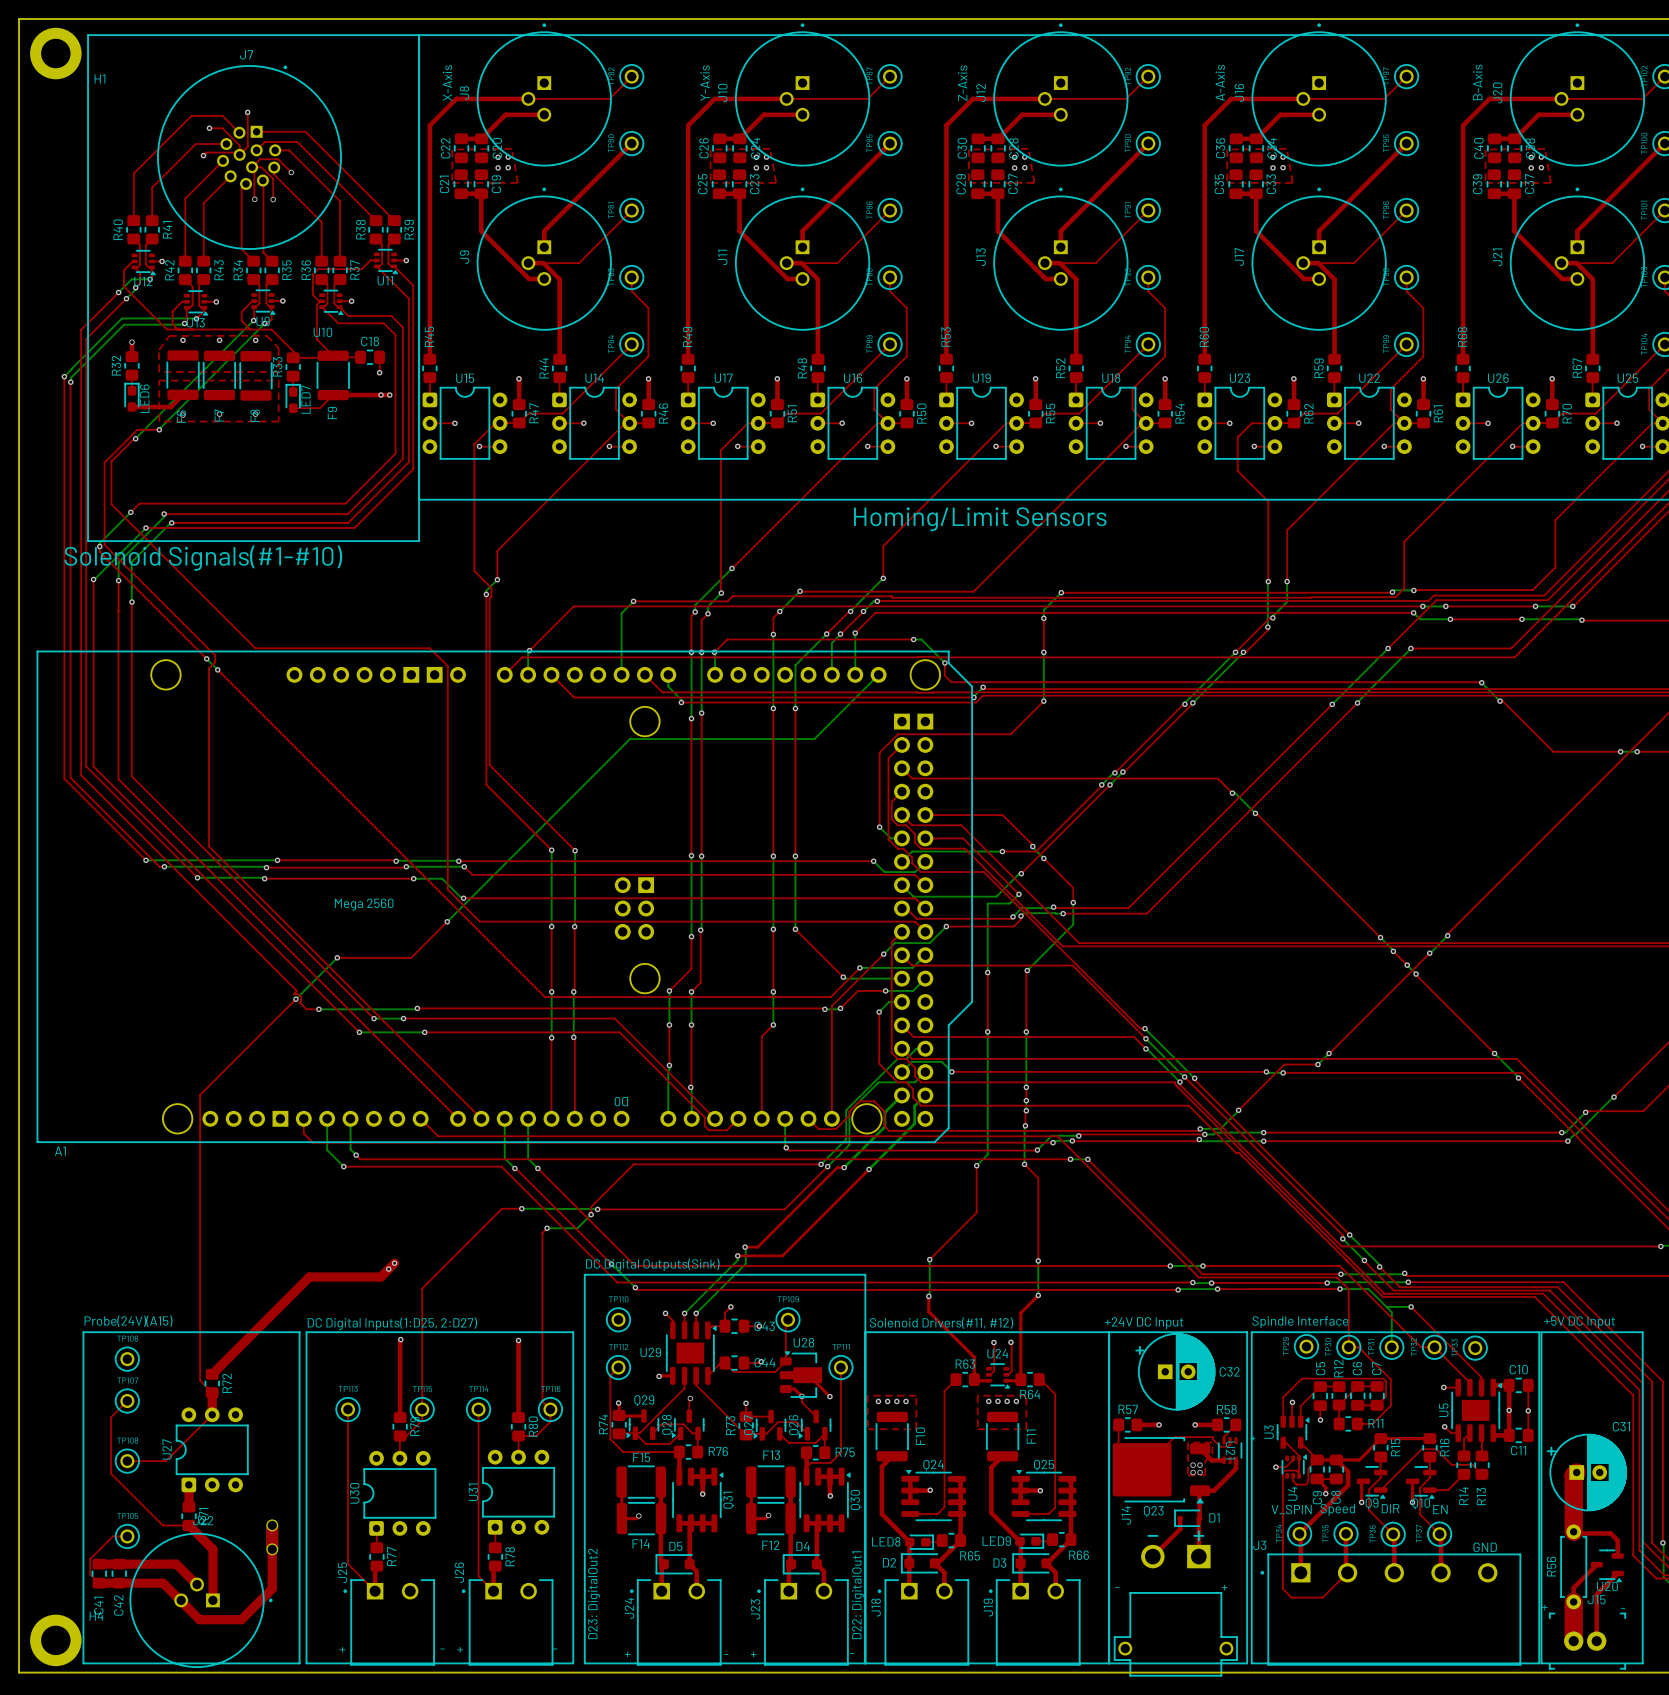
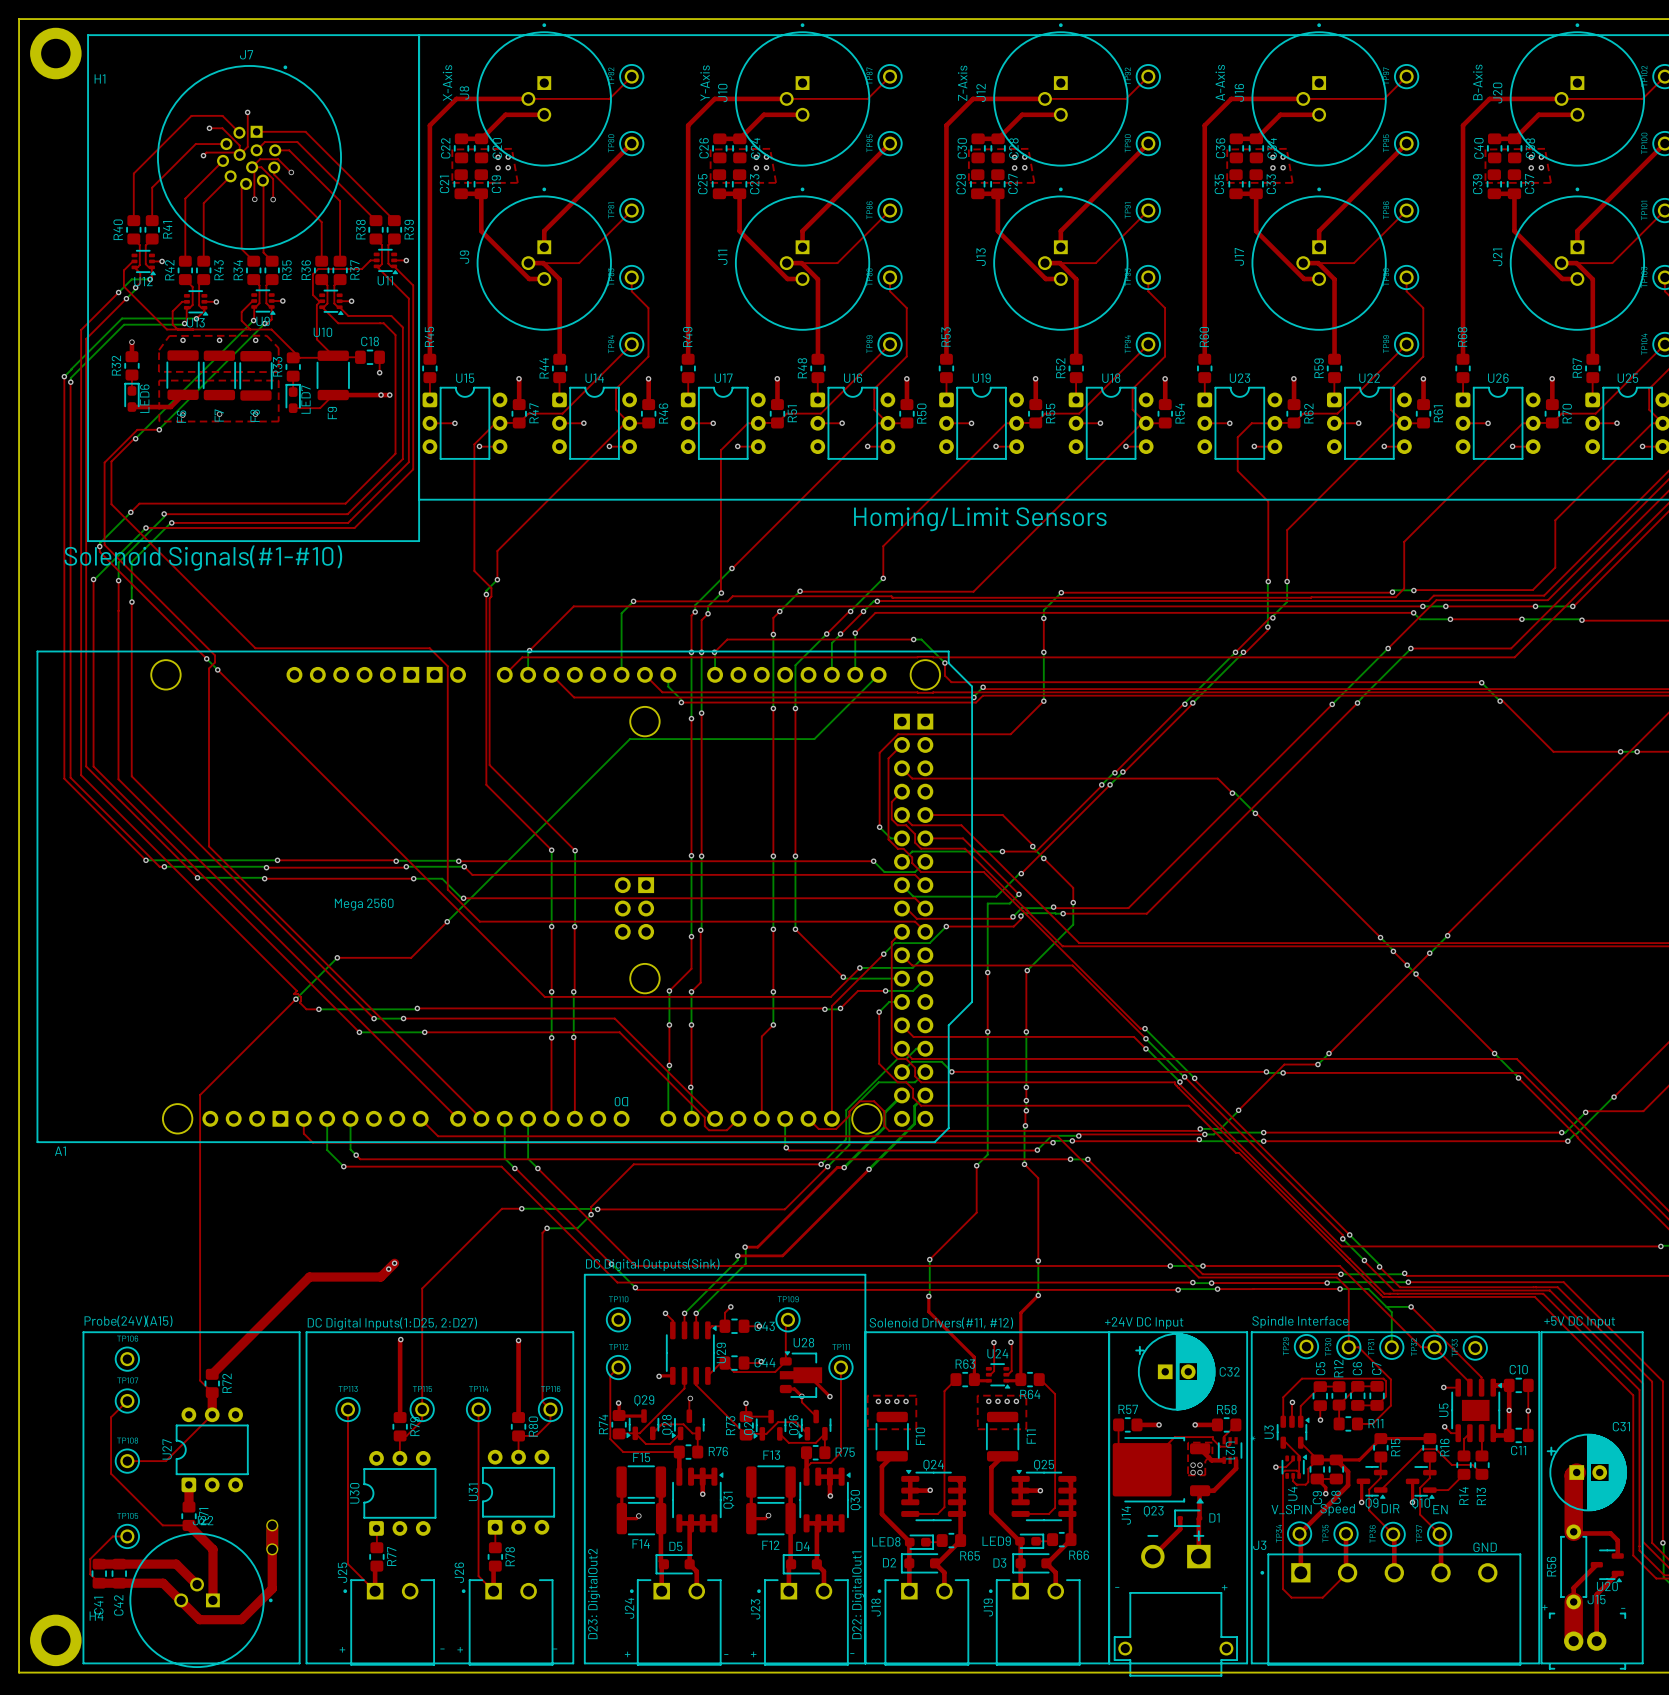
U29 footprint: [666, 1321, 717, 1385] -> [666, 1321, 717, 1385]
U29 name position: U29 (650, 1352) -> U29 (721, 1352)

